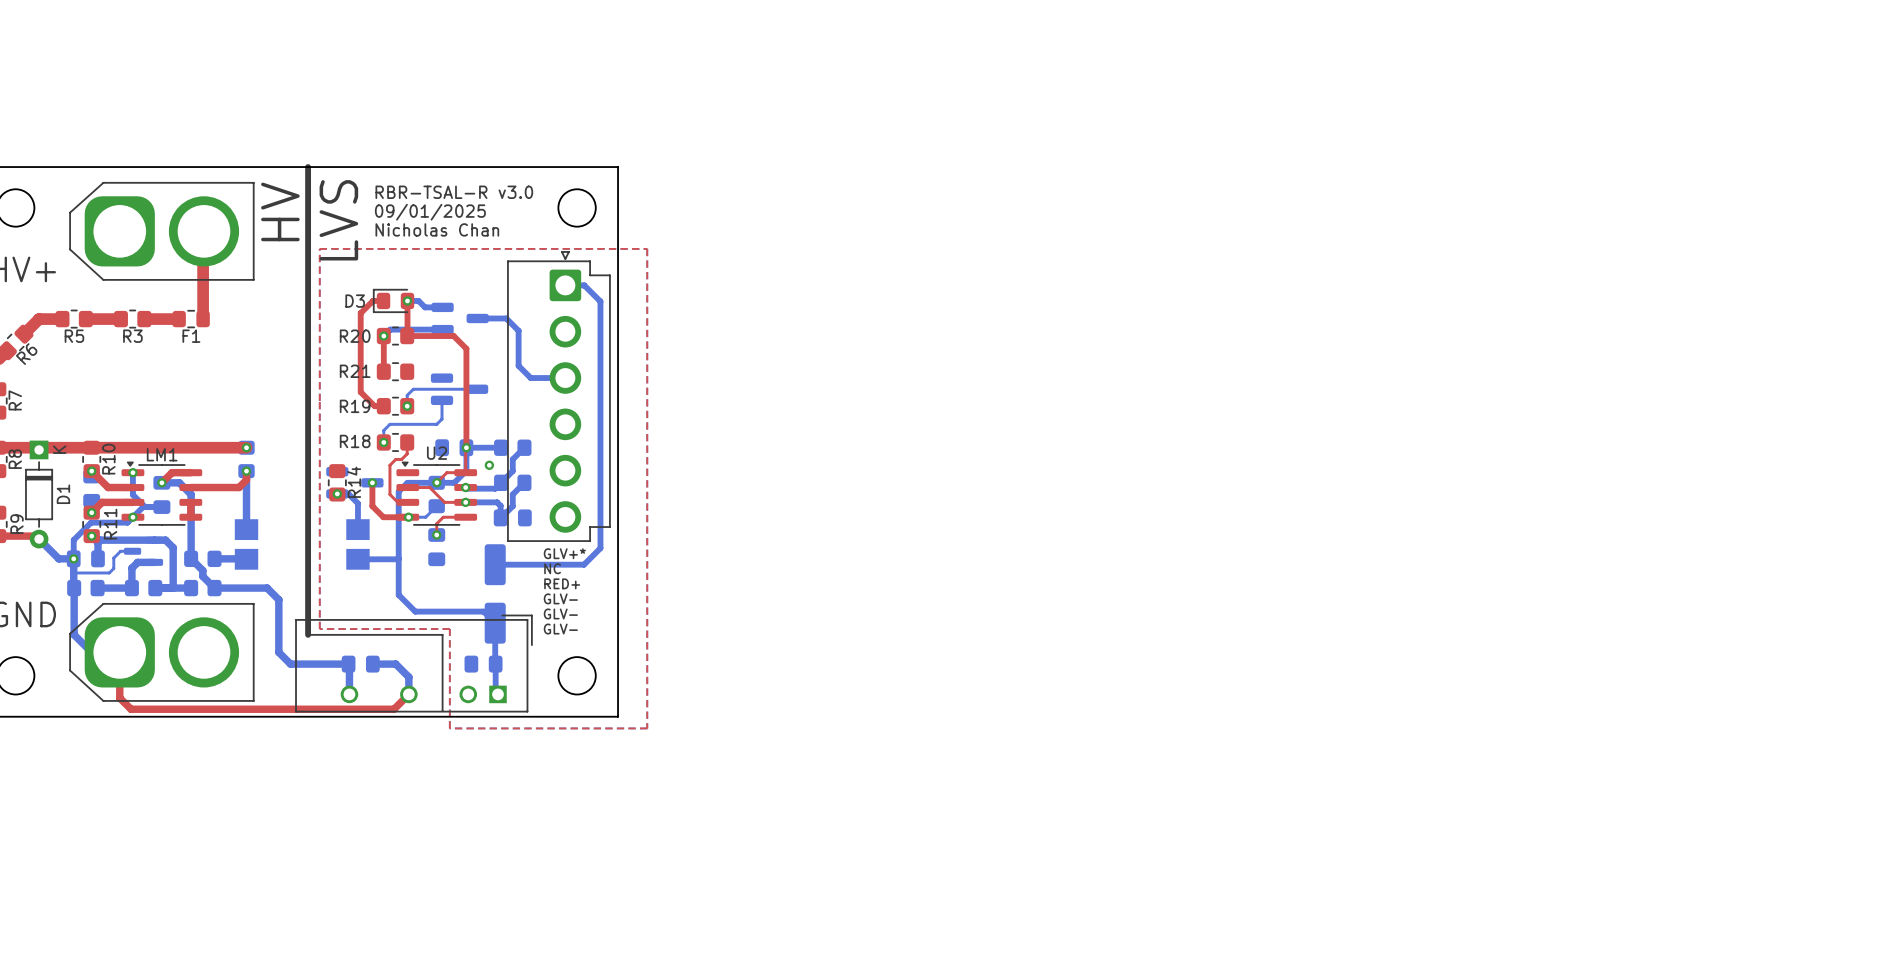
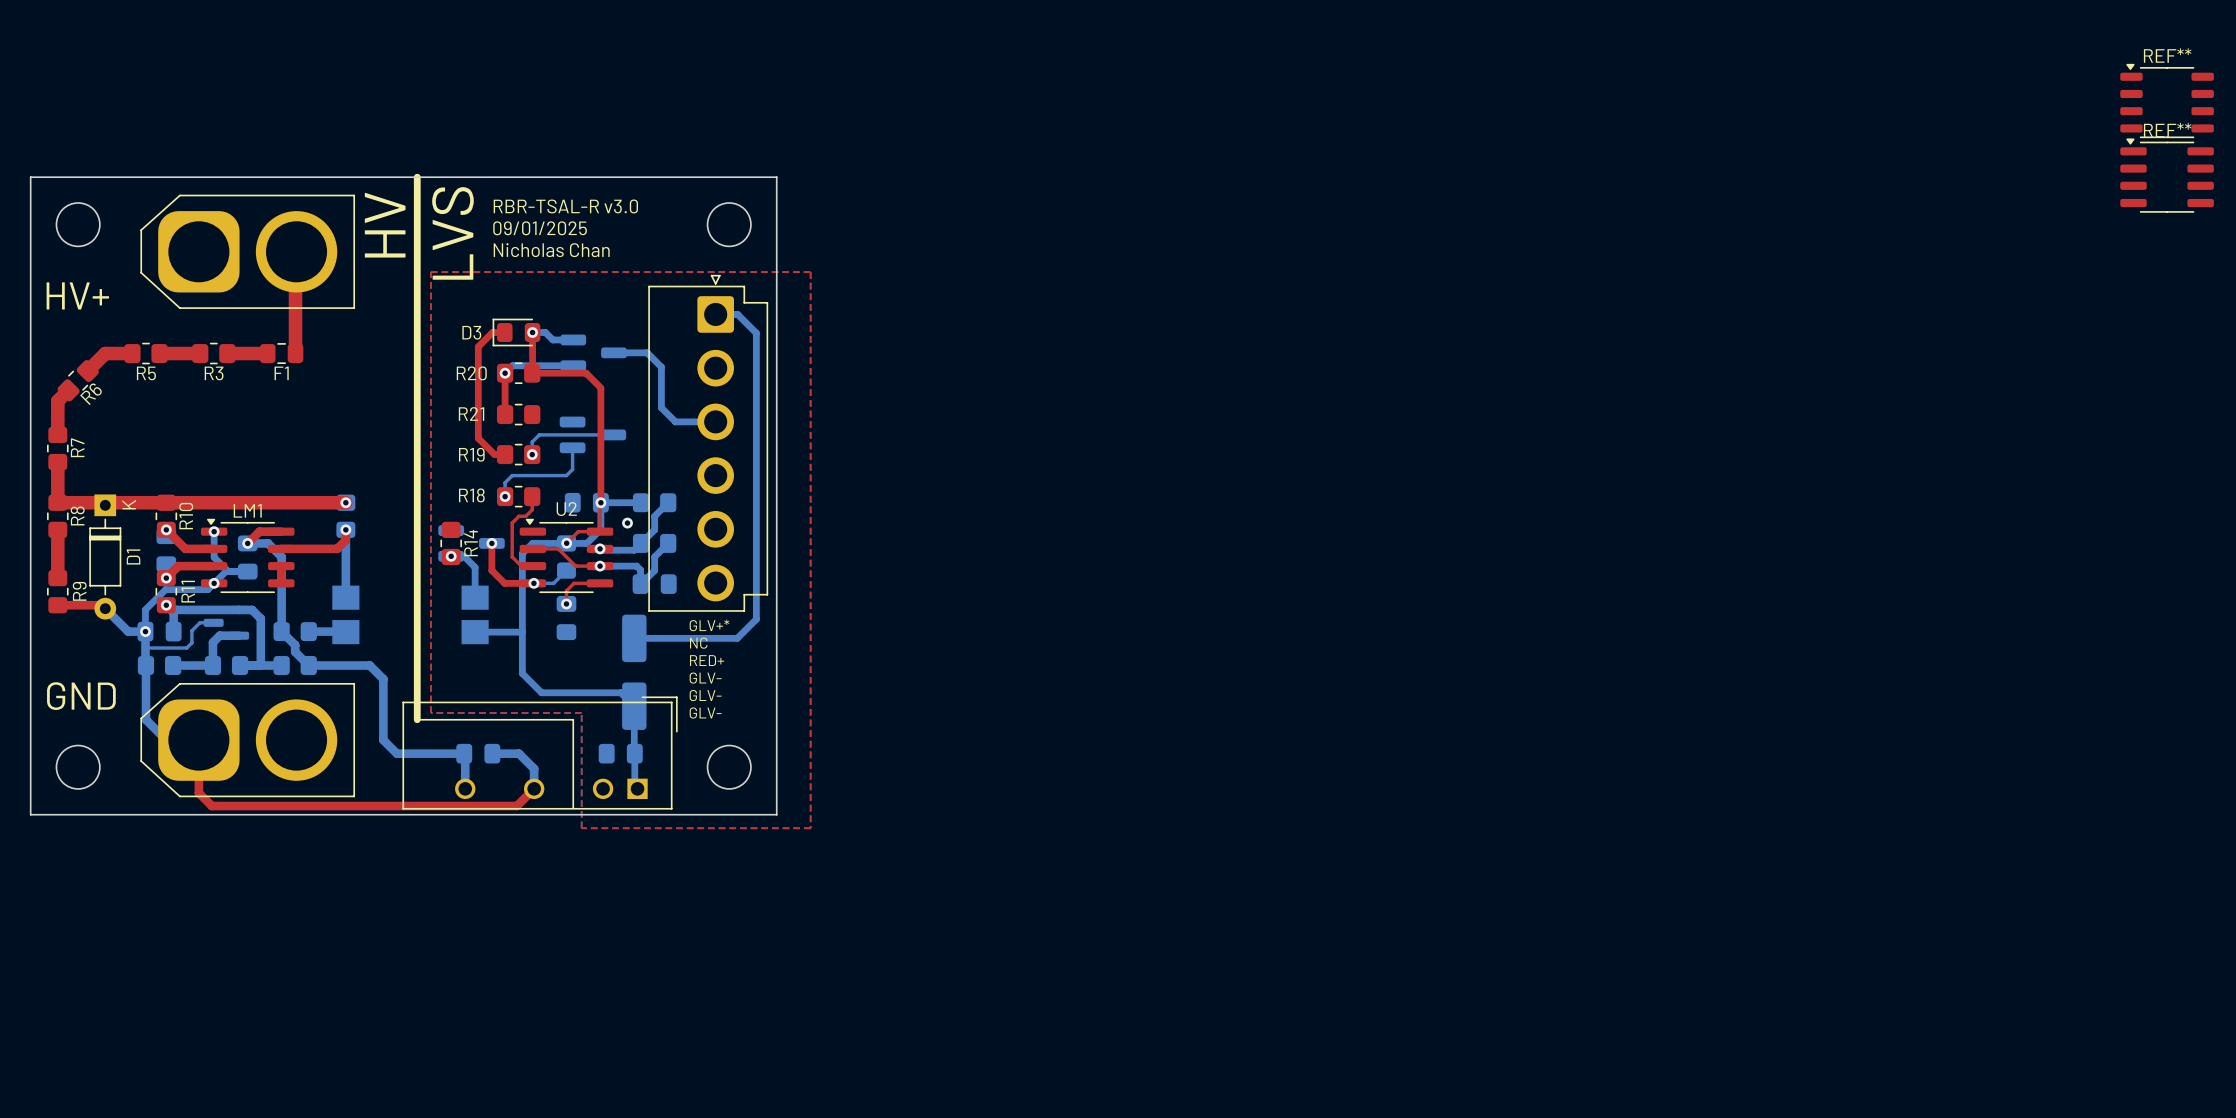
REF**: none -> (2167, 100)
REF**: none -> (2167, 175)

